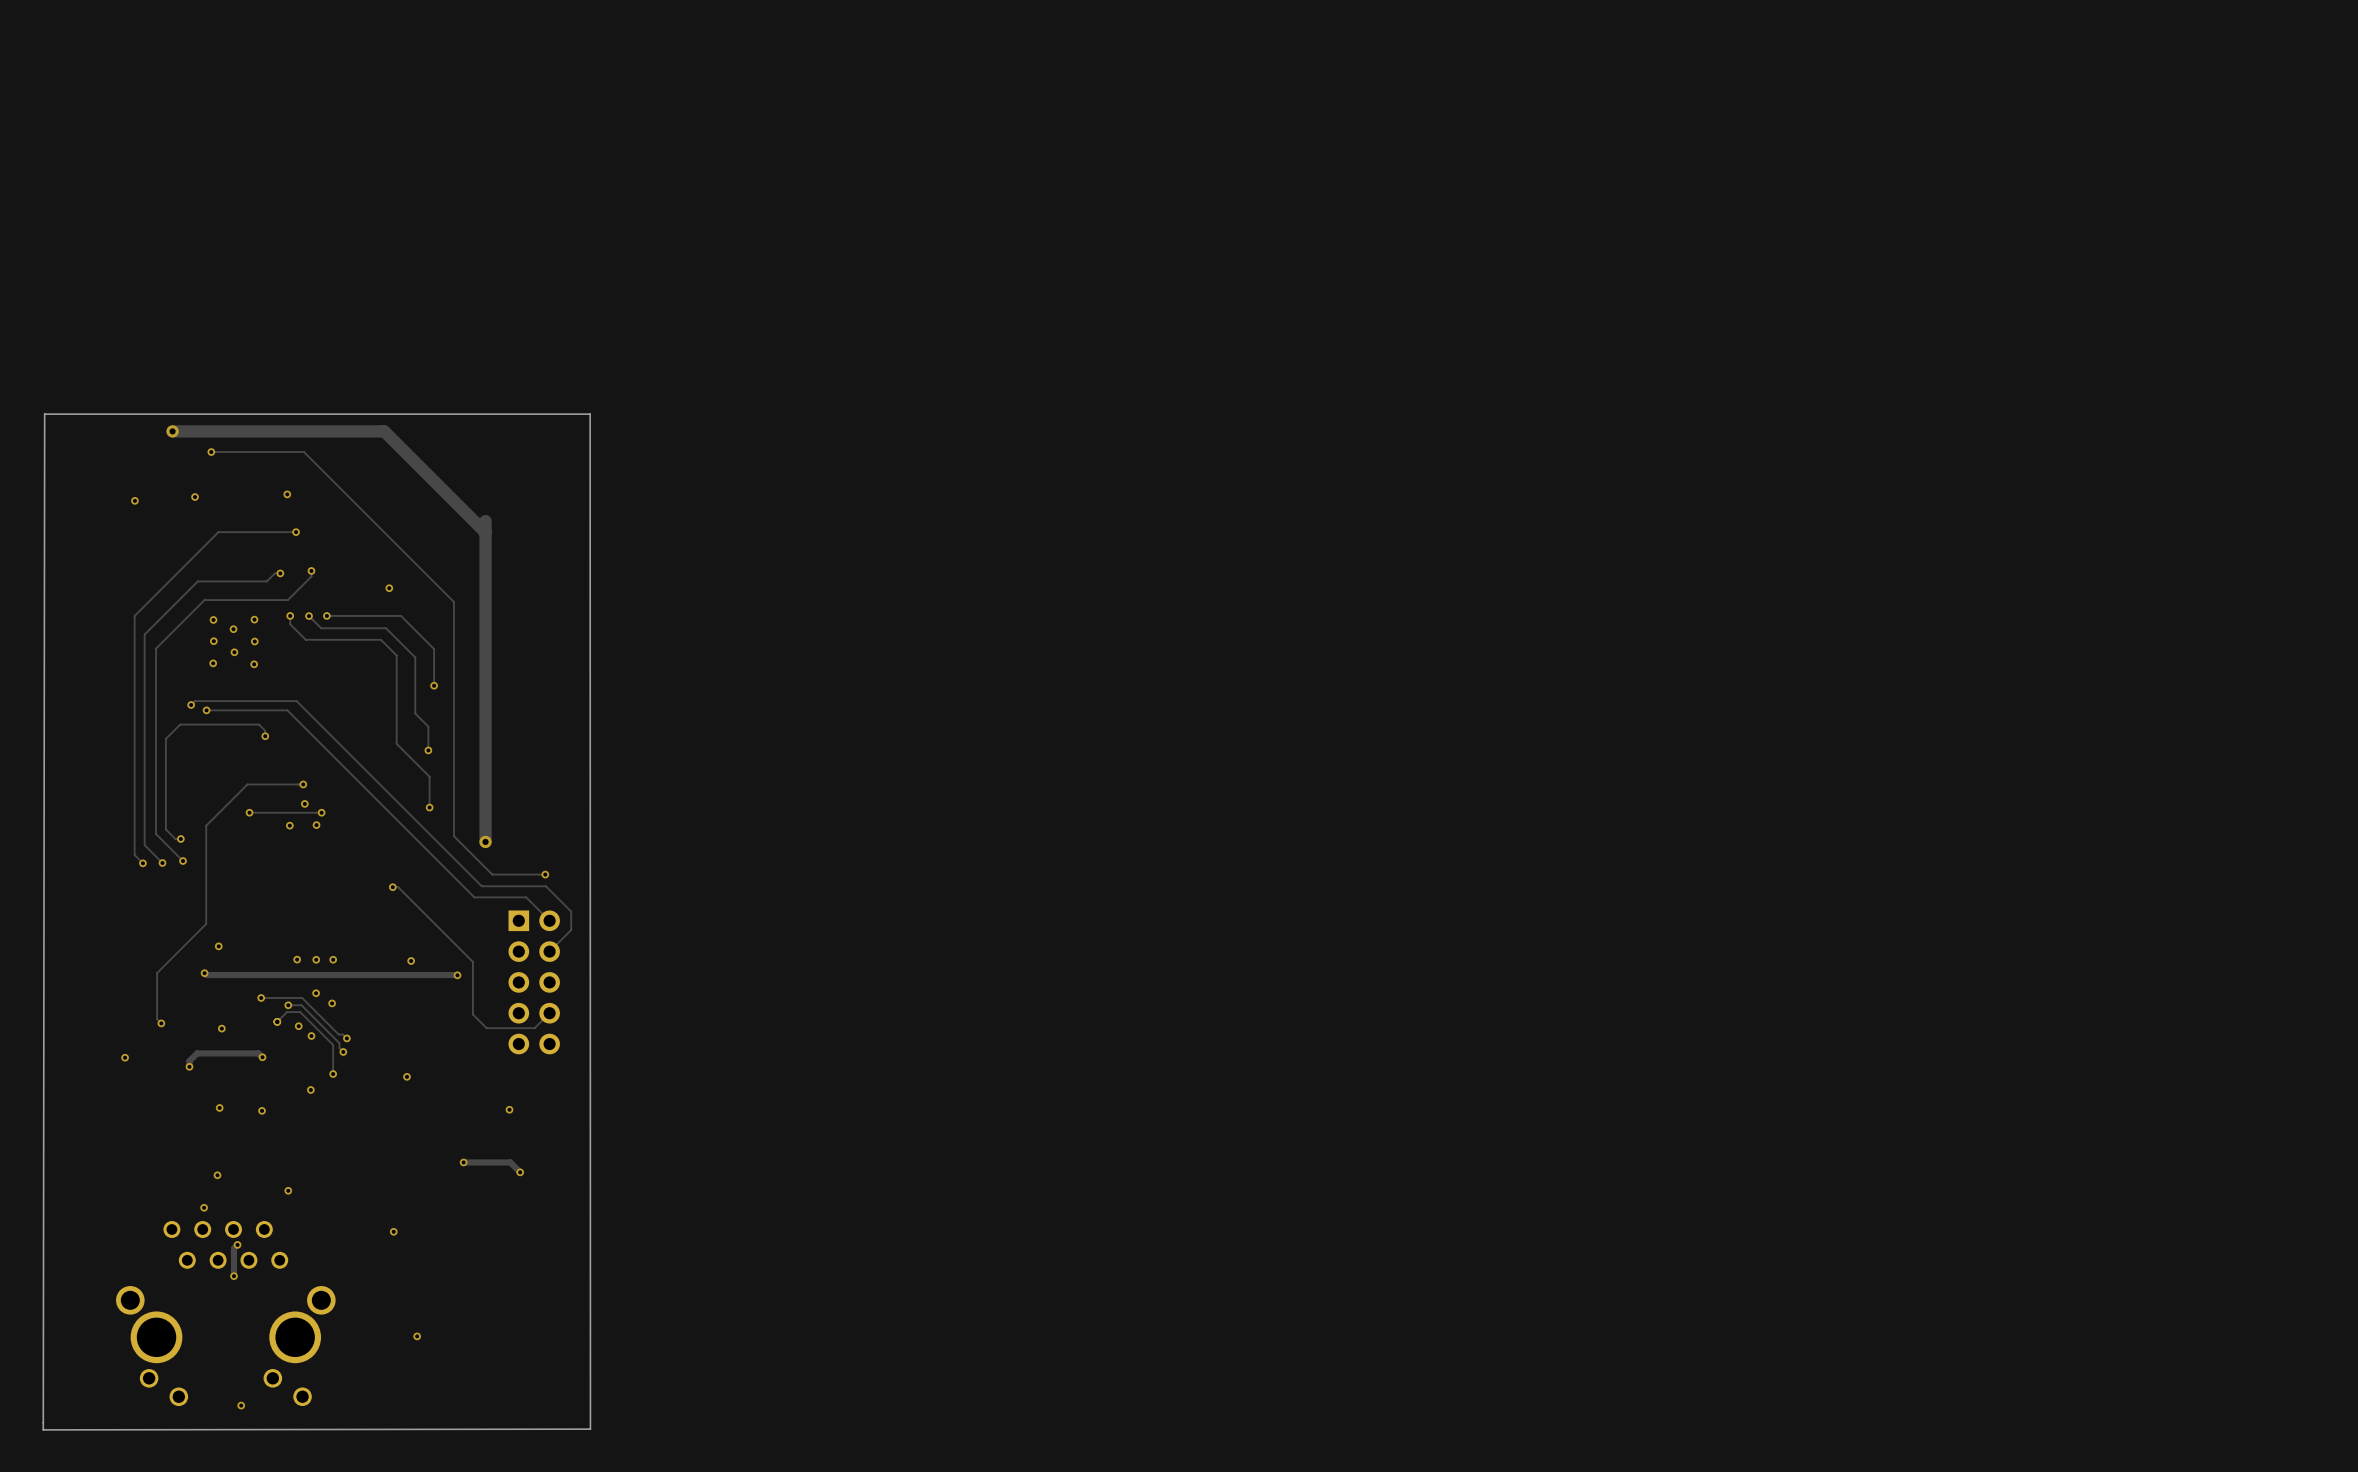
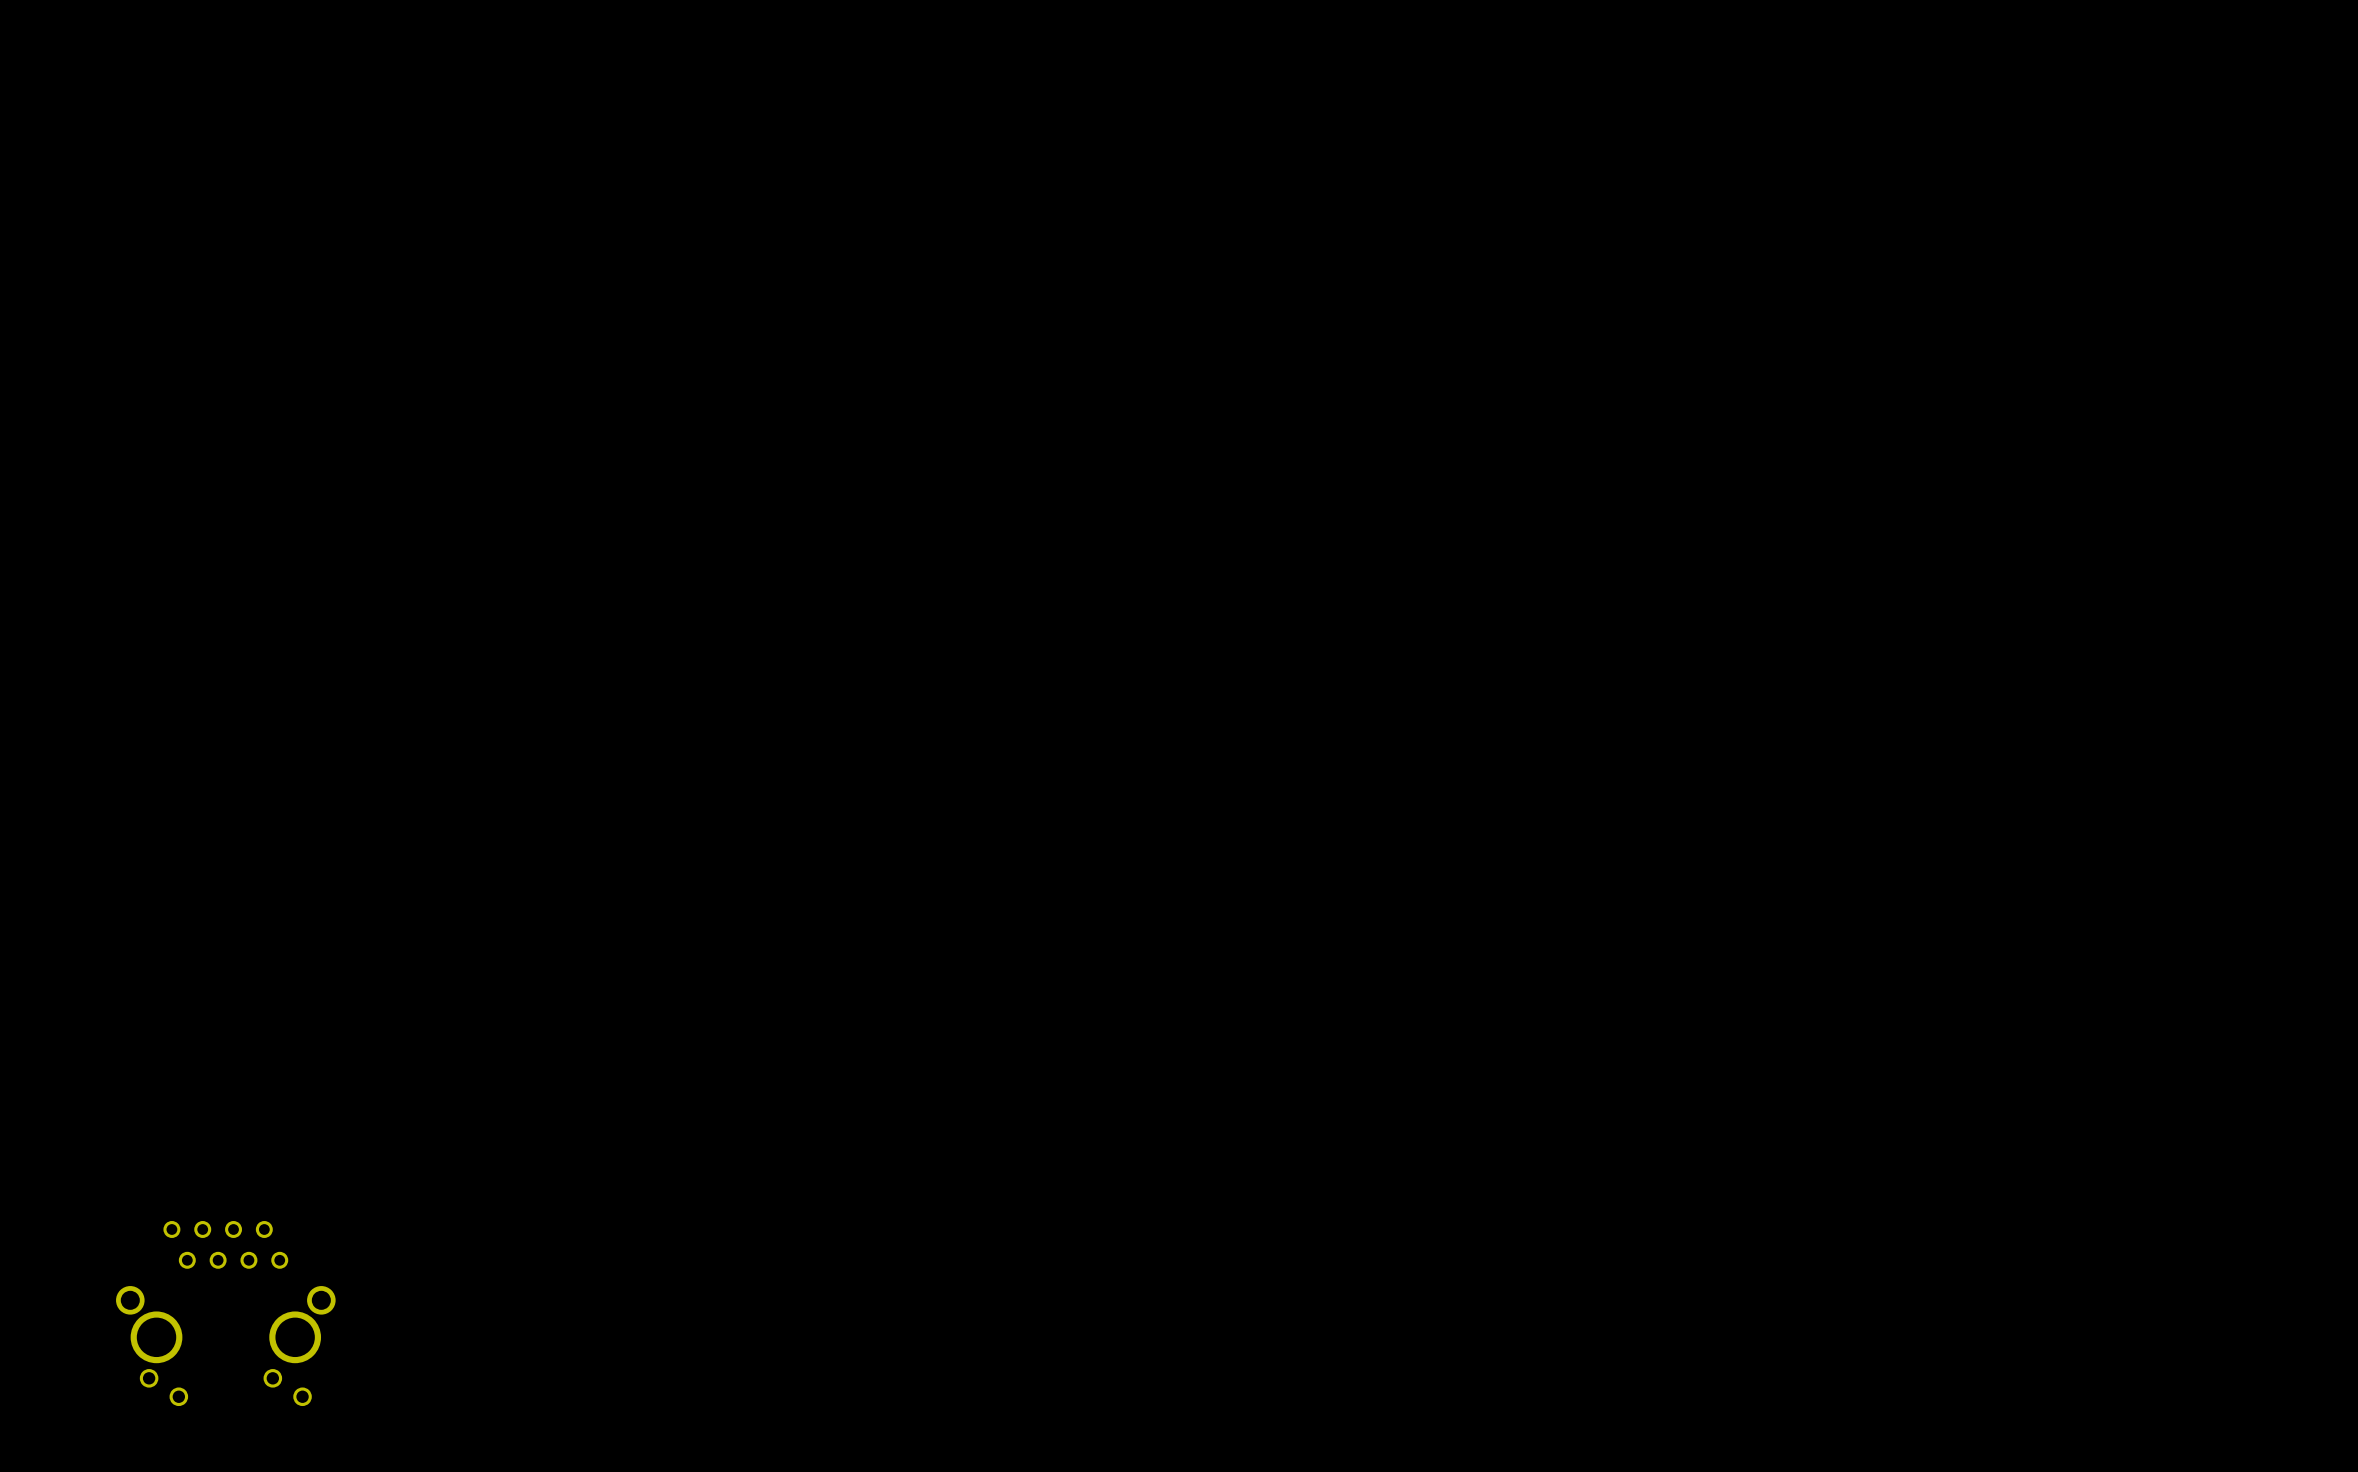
board edge: (590, 414) (590, 1429) (43, 1429) (44, 414) (590, 414) -> none
track: (172, 431) (384, 431) (485, 532) -> none
via: (172, 431) -> none
track: (211, 452) (303, 452) (453, 602) (453, 836) (492, 874) (545, 874) -> none
via: (211, 452) -> none
via: (287, 494) -> none
via: (195, 497) -> none
via: (134, 500) -> none
track: (485, 521) (485, 841) -> none
track: (296, 532) (218, 532) (134, 615) (134, 855) (142, 863) -> none
via: (296, 532) -> none
track: (311, 570) (311, 576) (287, 600) (204, 600) (156, 648) (156, 834) (183, 861) -> none
via: (311, 570) -> none
track: (280, 573) (274, 573) (266, 581) (197, 581) (144, 634) (144, 845) (162, 863) -> none
via: (280, 573) -> none
via: (389, 588) -> none
track: (290, 615) (290, 624) (305, 639) (380, 639) (396, 655) (396, 743) (429, 776) (429, 807) -> none
via: (290, 615) -> none
track: (326, 615) (400, 615) (434, 649) (434, 685) -> none
via: (326, 615) -> none
track: (309, 616) (321, 628) (386, 628) (415, 657) (415, 713) (428, 726) (428, 750) -> none
via: (309, 616) -> none
via: (213, 619) -> none
via: (254, 619) -> none
via: (233, 629) -> none
via: (213, 641) -> none
via: (254, 641) -> none
via: (234, 652) -> none
via: (213, 663) -> none
via: (254, 664) -> none
via: (434, 685) -> none
track: (191, 704) (195, 701) (296, 701) (481, 886) (545, 886) (571, 911) (571, 930) (549, 951) -> none
via: (191, 704) -> none
track: (206, 710) (287, 710) (474, 897) (526, 897) (549, 920) -> none
via: (206, 710) -> none
track: (265, 736) (265, 730) (259, 724) (180, 724) (165, 738) (165, 829) (175, 838) (180, 838) -> none
via: (265, 736) -> none
via: (428, 750) -> none
track: (303, 784) (247, 784) (206, 825) (206, 923) (157, 973) (157, 1019) (161, 1023) -> none
via: (303, 784) -> none
via: (304, 803) -> none
via: (429, 807) -> none
via: (249, 812) -> none
track: (321, 812) (249, 812) -> none
via: (321, 812) -> none
via: (289, 825) -> none
via: (316, 825) -> none
via: (180, 838) -> none
via: (485, 841) -> none
via: (183, 861) -> none
via: (142, 863) -> none
via: (162, 863) -> none
via: (545, 874) -> none
track: (392, 887) (398, 887) (472, 961) (472, 1014) (486, 1028) (534, 1028) (549, 1013) -> none
via: (392, 887) -> none
via: (218, 946) -> none
via: (297, 959) -> none
via: (316, 959) -> none
via: (333, 959) -> none
via: (411, 960) -> none
track: (204, 973) (206, 975) (457, 975) -> none
via: (204, 973) -> none
via: (457, 975) -> none
part: (534, 982) -> none
via: (316, 993) -> none
track: (261, 998) (302, 998) (338, 1034) (343, 1034) (346, 1038) -> none
via: (261, 998) -> none
via: (332, 1003) -> none
track: (288, 1005) (301, 1005) (339, 1043) (339, 1048) (343, 1051) -> none
via: (288, 1005) -> none
track: (277, 1021) (287, 1012) (300, 1012) (333, 1045) (333, 1074) -> none
via: (277, 1021) -> none
via: (161, 1023) -> none
via: (298, 1026) -> none
via: (221, 1028) -> none
via: (311, 1036) -> none
via: (346, 1038) -> none
via: (343, 1051) -> none
via: (125, 1057) -> none
track: (262, 1057) (258, 1053) (197, 1053) (189, 1061) (189, 1066) -> none
via: (262, 1057) -> none
via: (189, 1066) -> none
via: (333, 1074) -> none
via: (406, 1076) -> none
via: (310, 1089) -> none
via: (219, 1107) -> none
via: (509, 1109) -> none
via: (262, 1110) -> none
track: (463, 1162) (510, 1162) (520, 1172) -> none
via: (463, 1162) -> none
via: (520, 1172) -> none
via: (217, 1175) -> none
via: (288, 1190) -> none
via: (204, 1207) -> none
via: (393, 1231) -> none
track: (237, 1244) (233, 1248) (233, 1276) -> none
via: (237, 1244) -> none
via: (233, 1276) -> none
via: (417, 1336) -> none
via: (241, 1405) -> none

